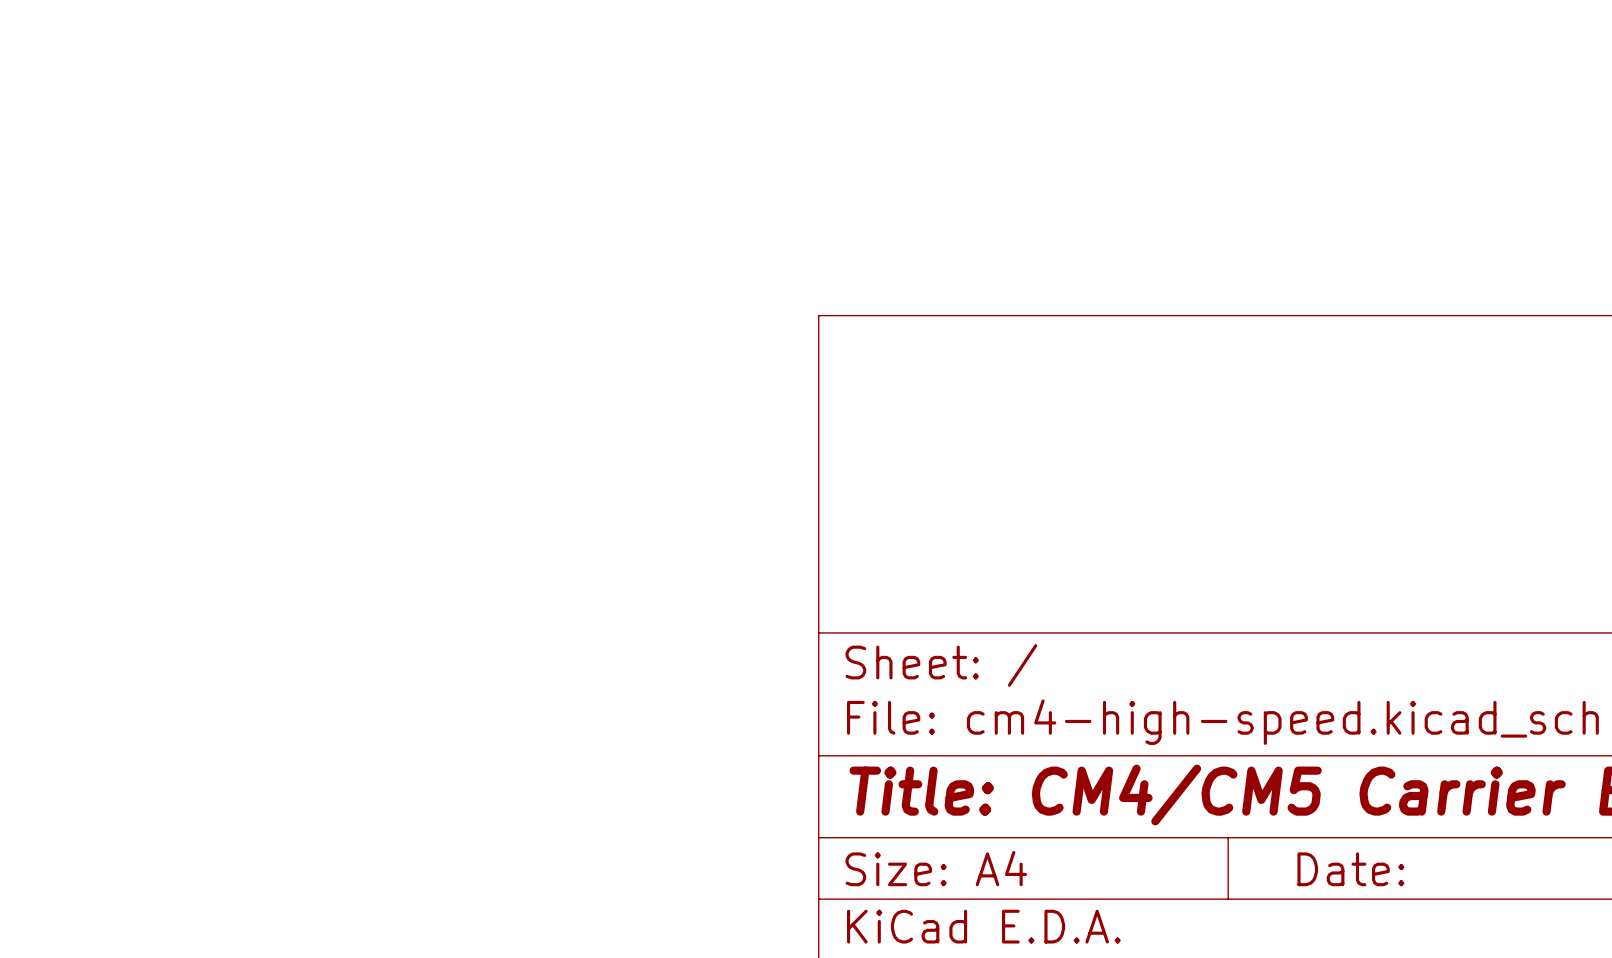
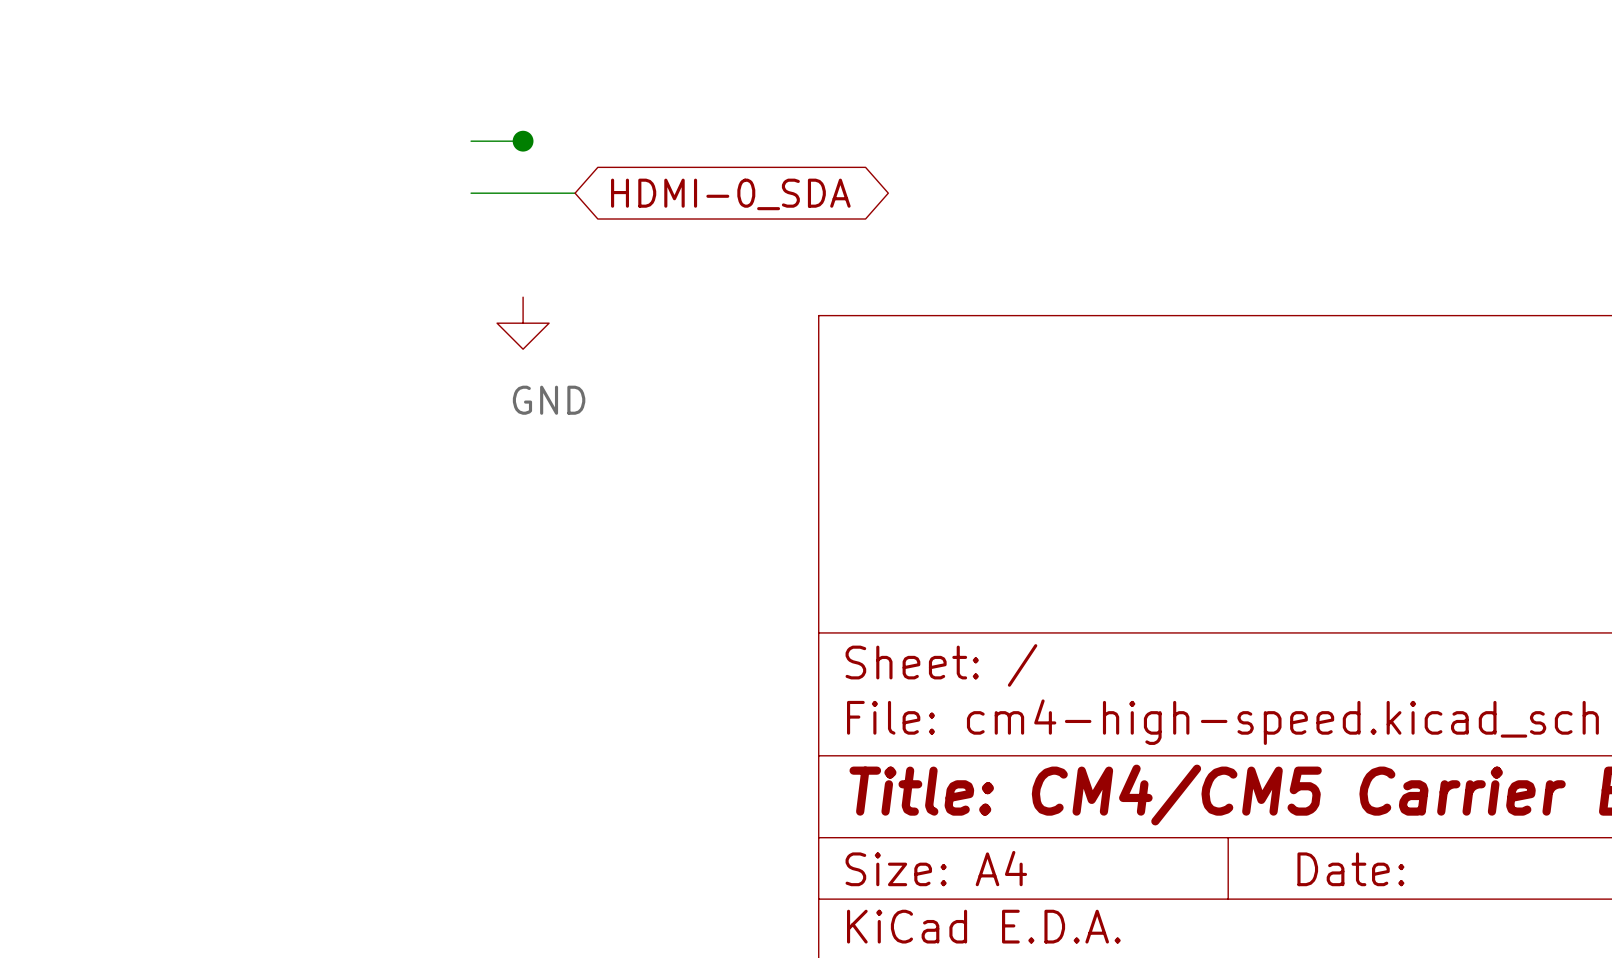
wire: none -> (471, 141) (523, 141)
junction: none -> (523, 141)
wire: none -> (471, 193) (575, 193)
global label: none -> HDMI-0_SDA (730, 194)
power symbol: none -> GND (523, 323)

